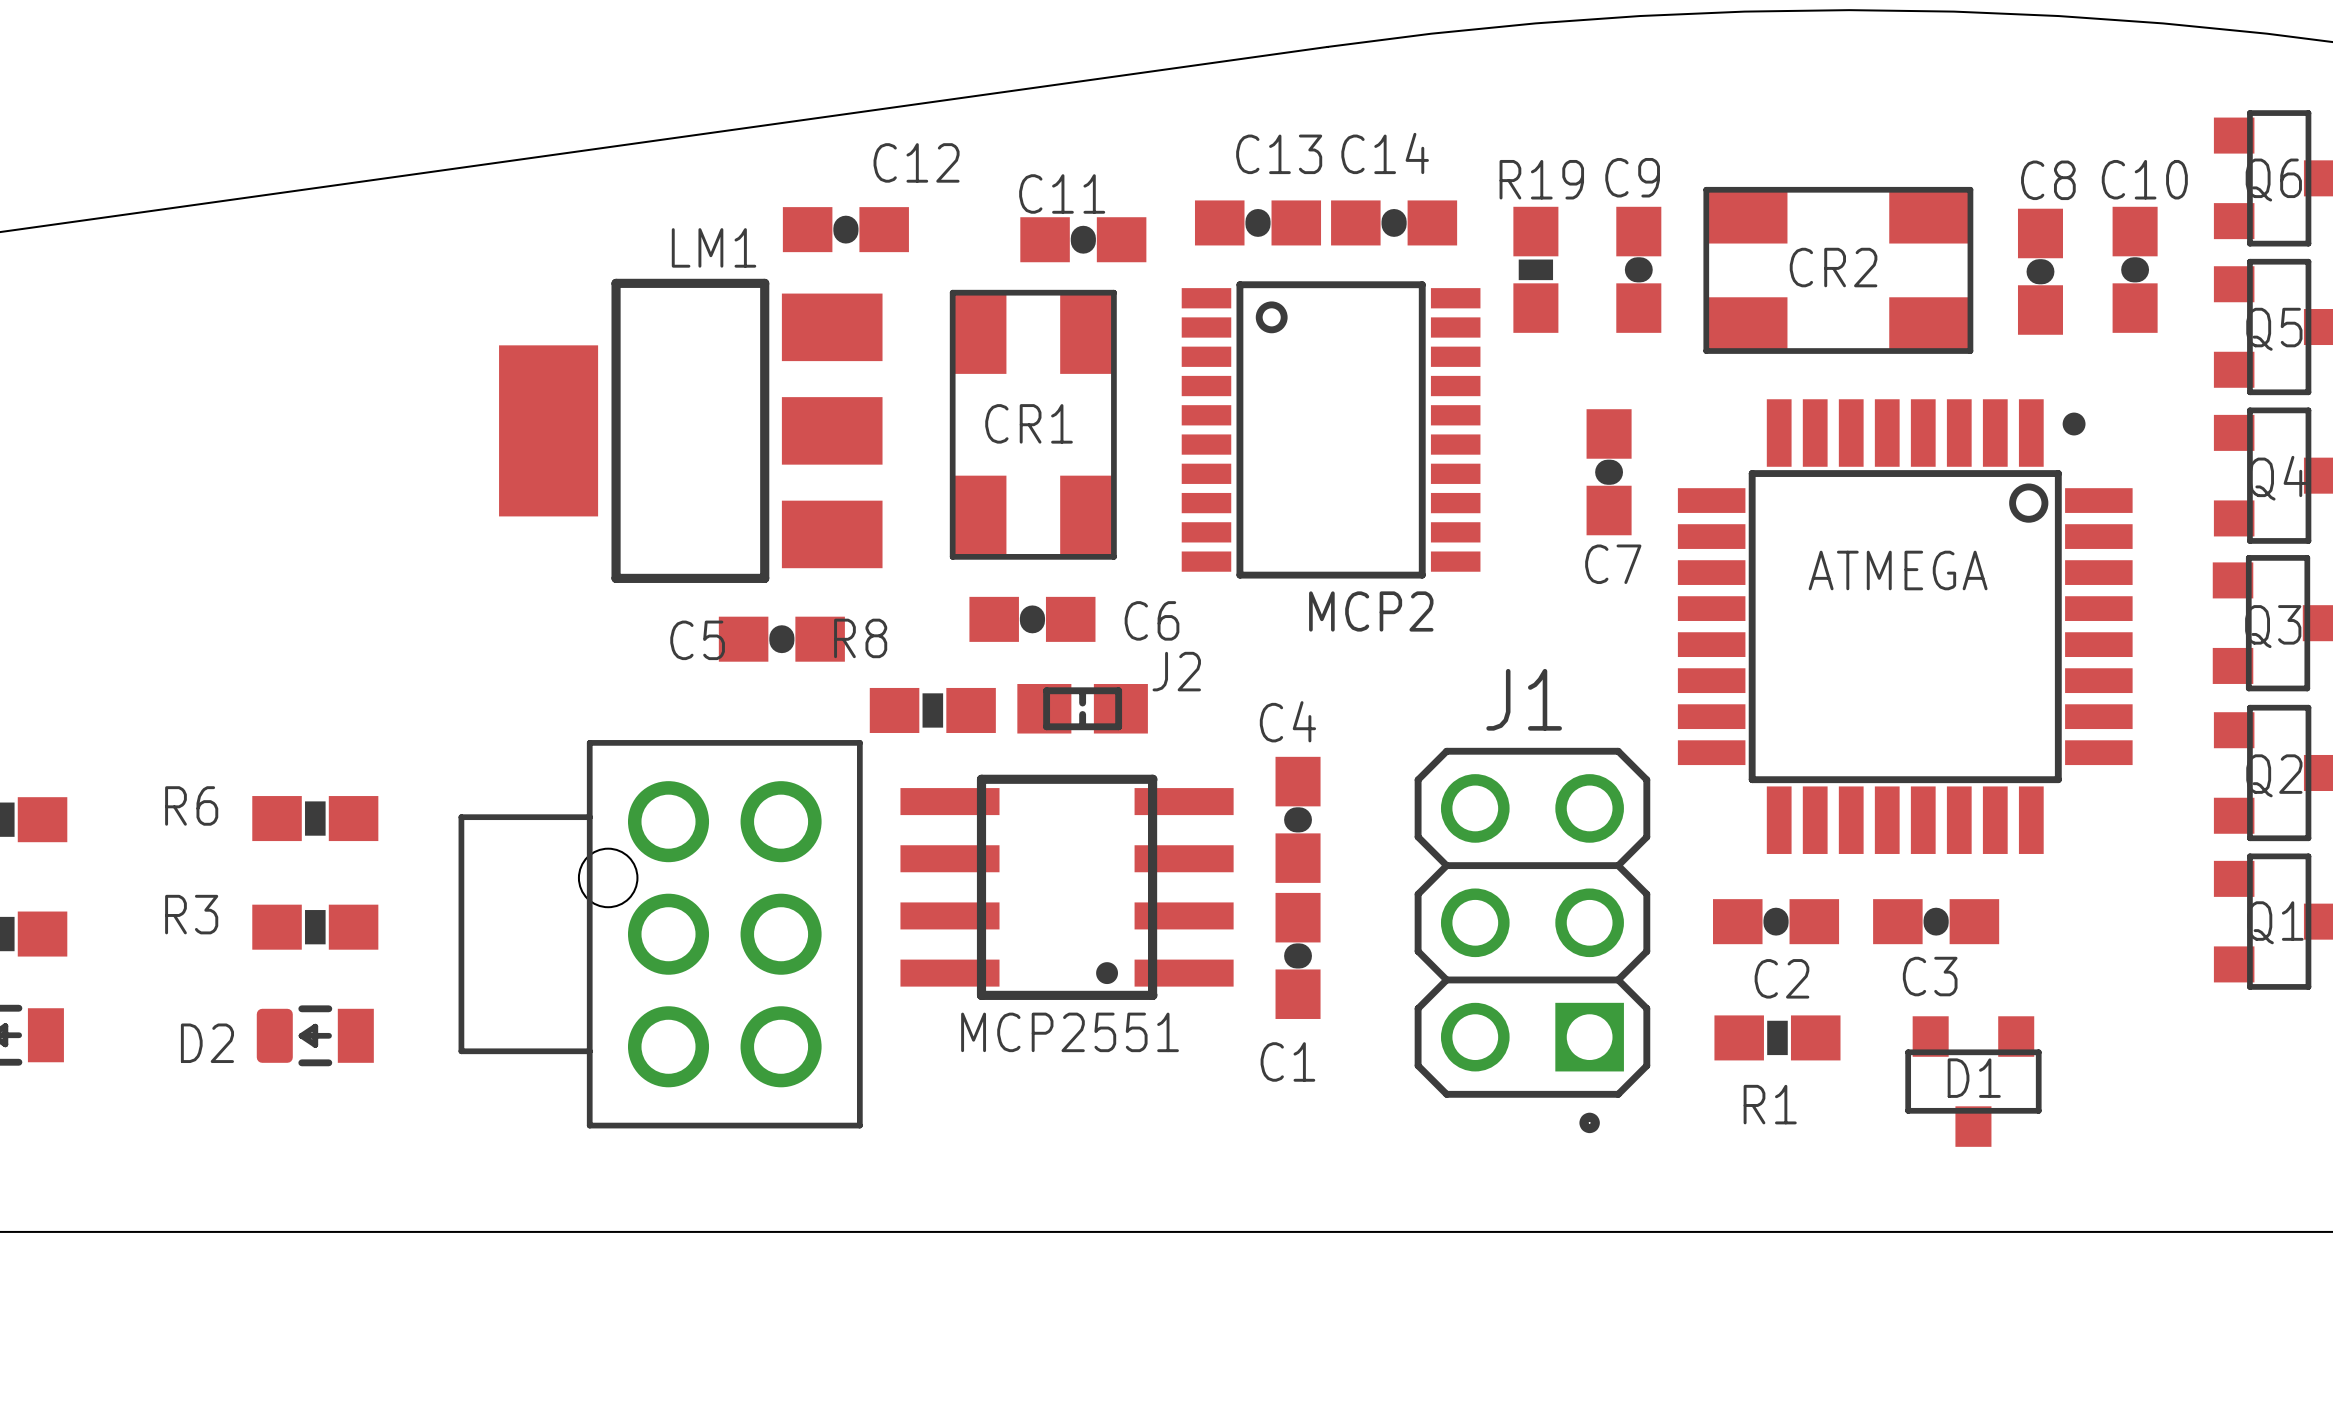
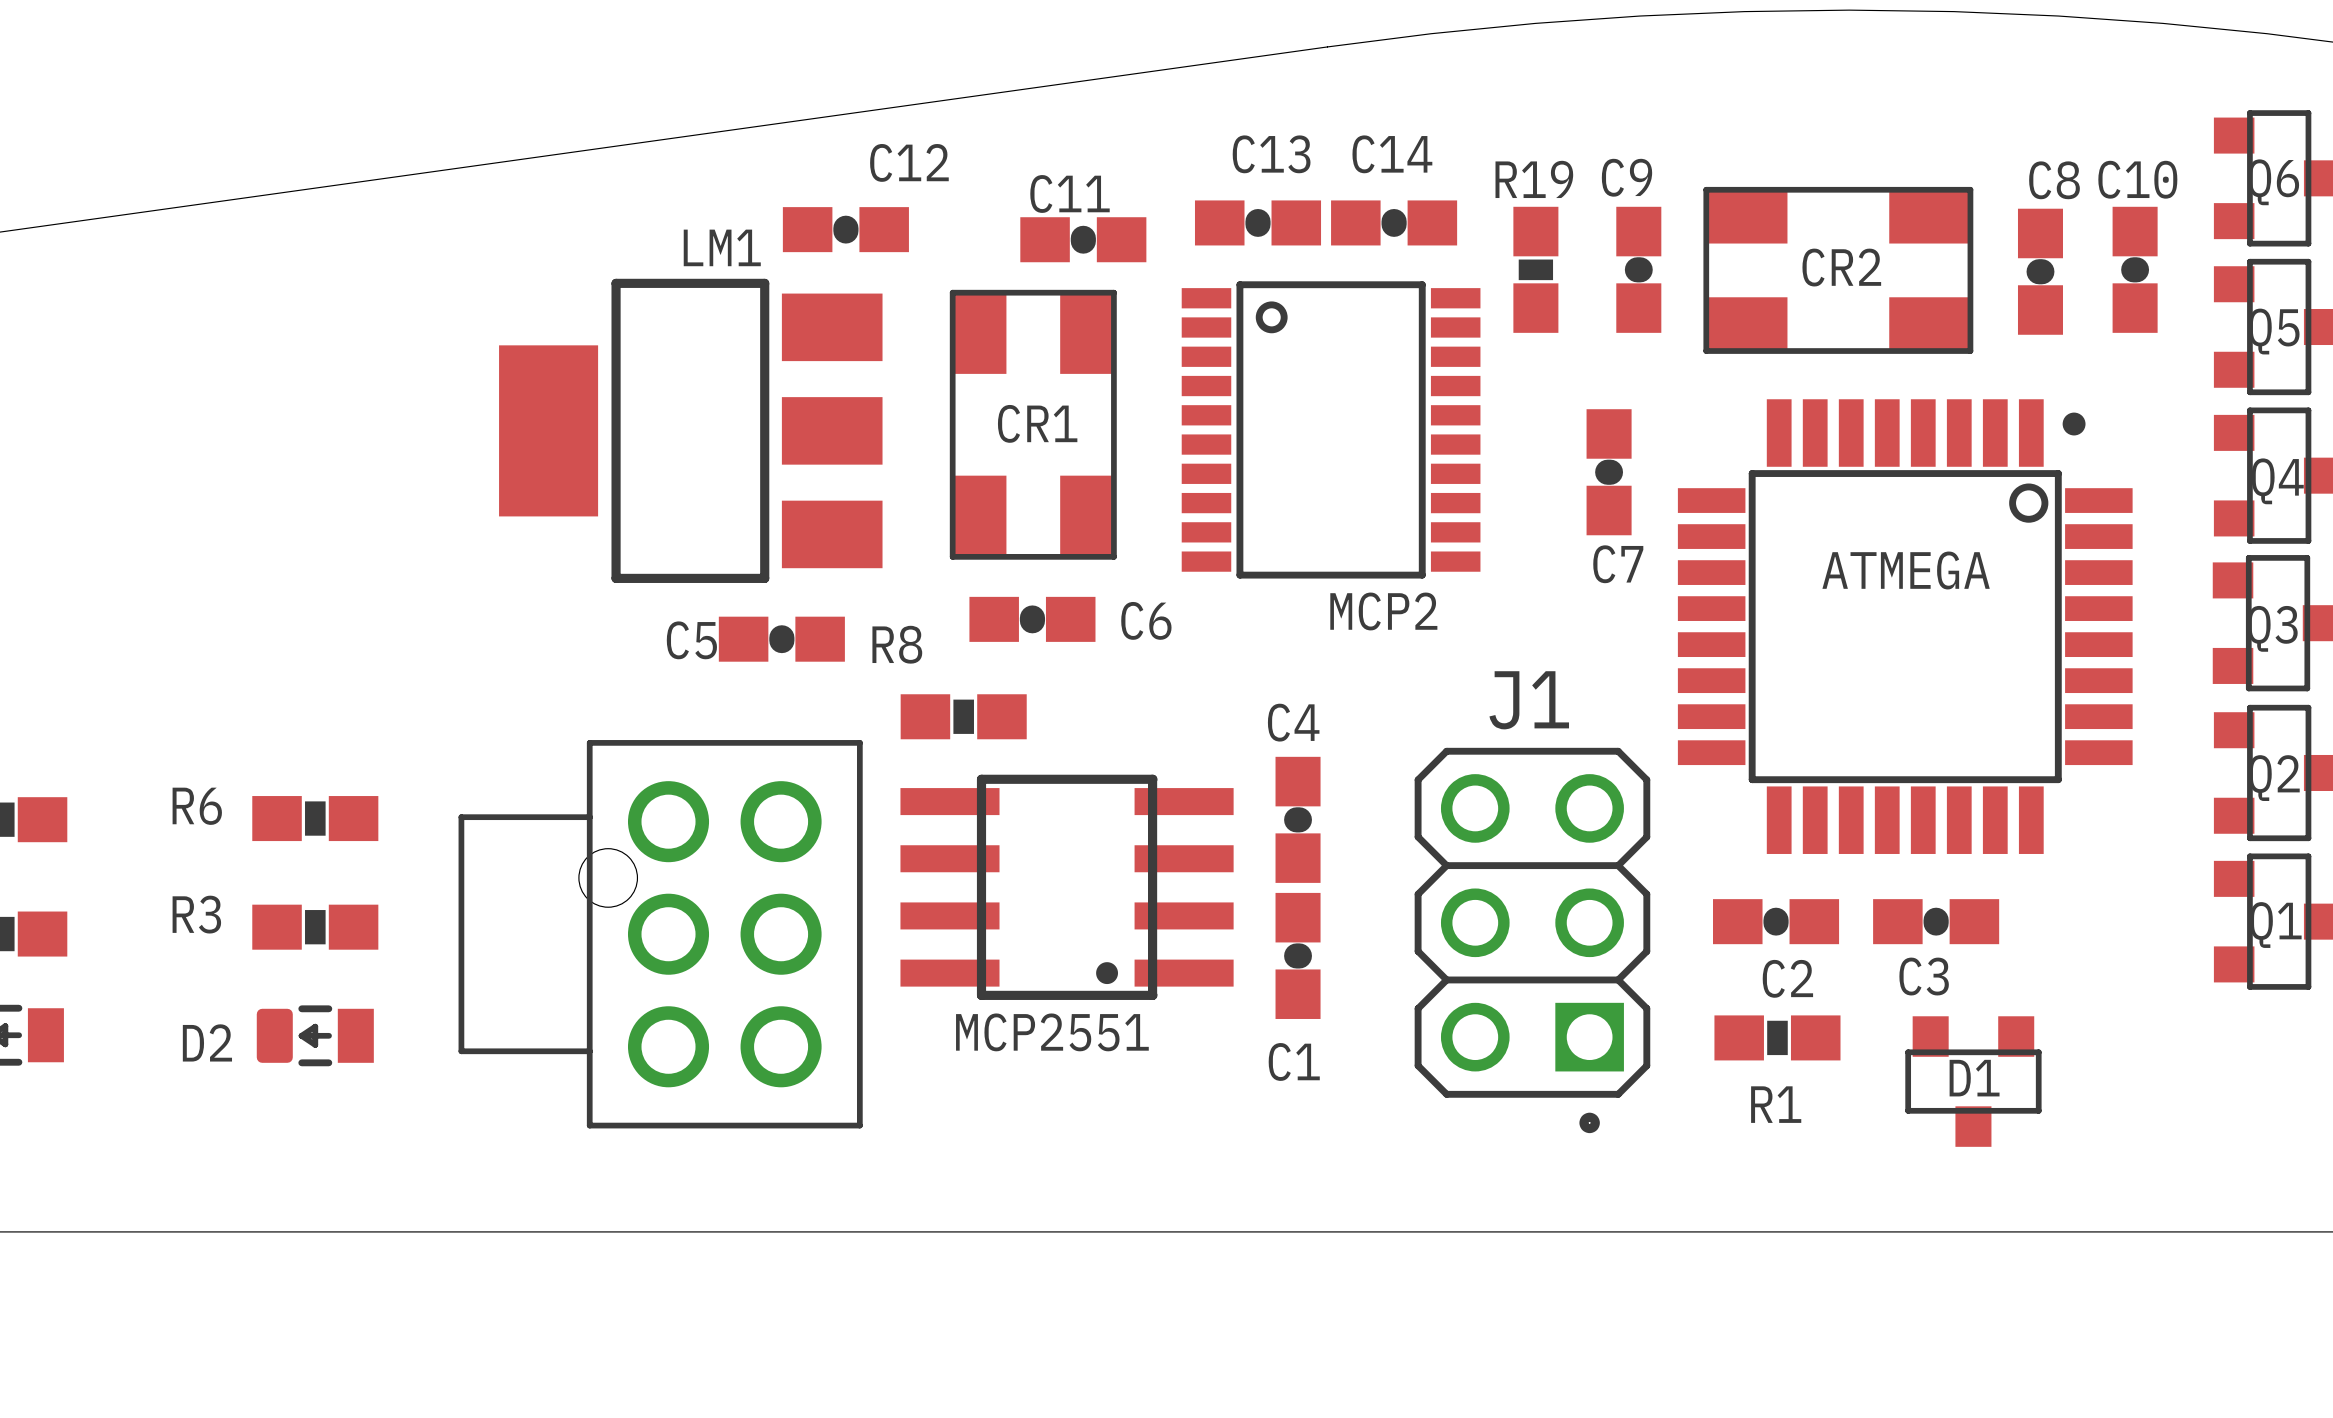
J2: (1082, 708) -> none
R8 position: (932, 710) -> (963, 716)

